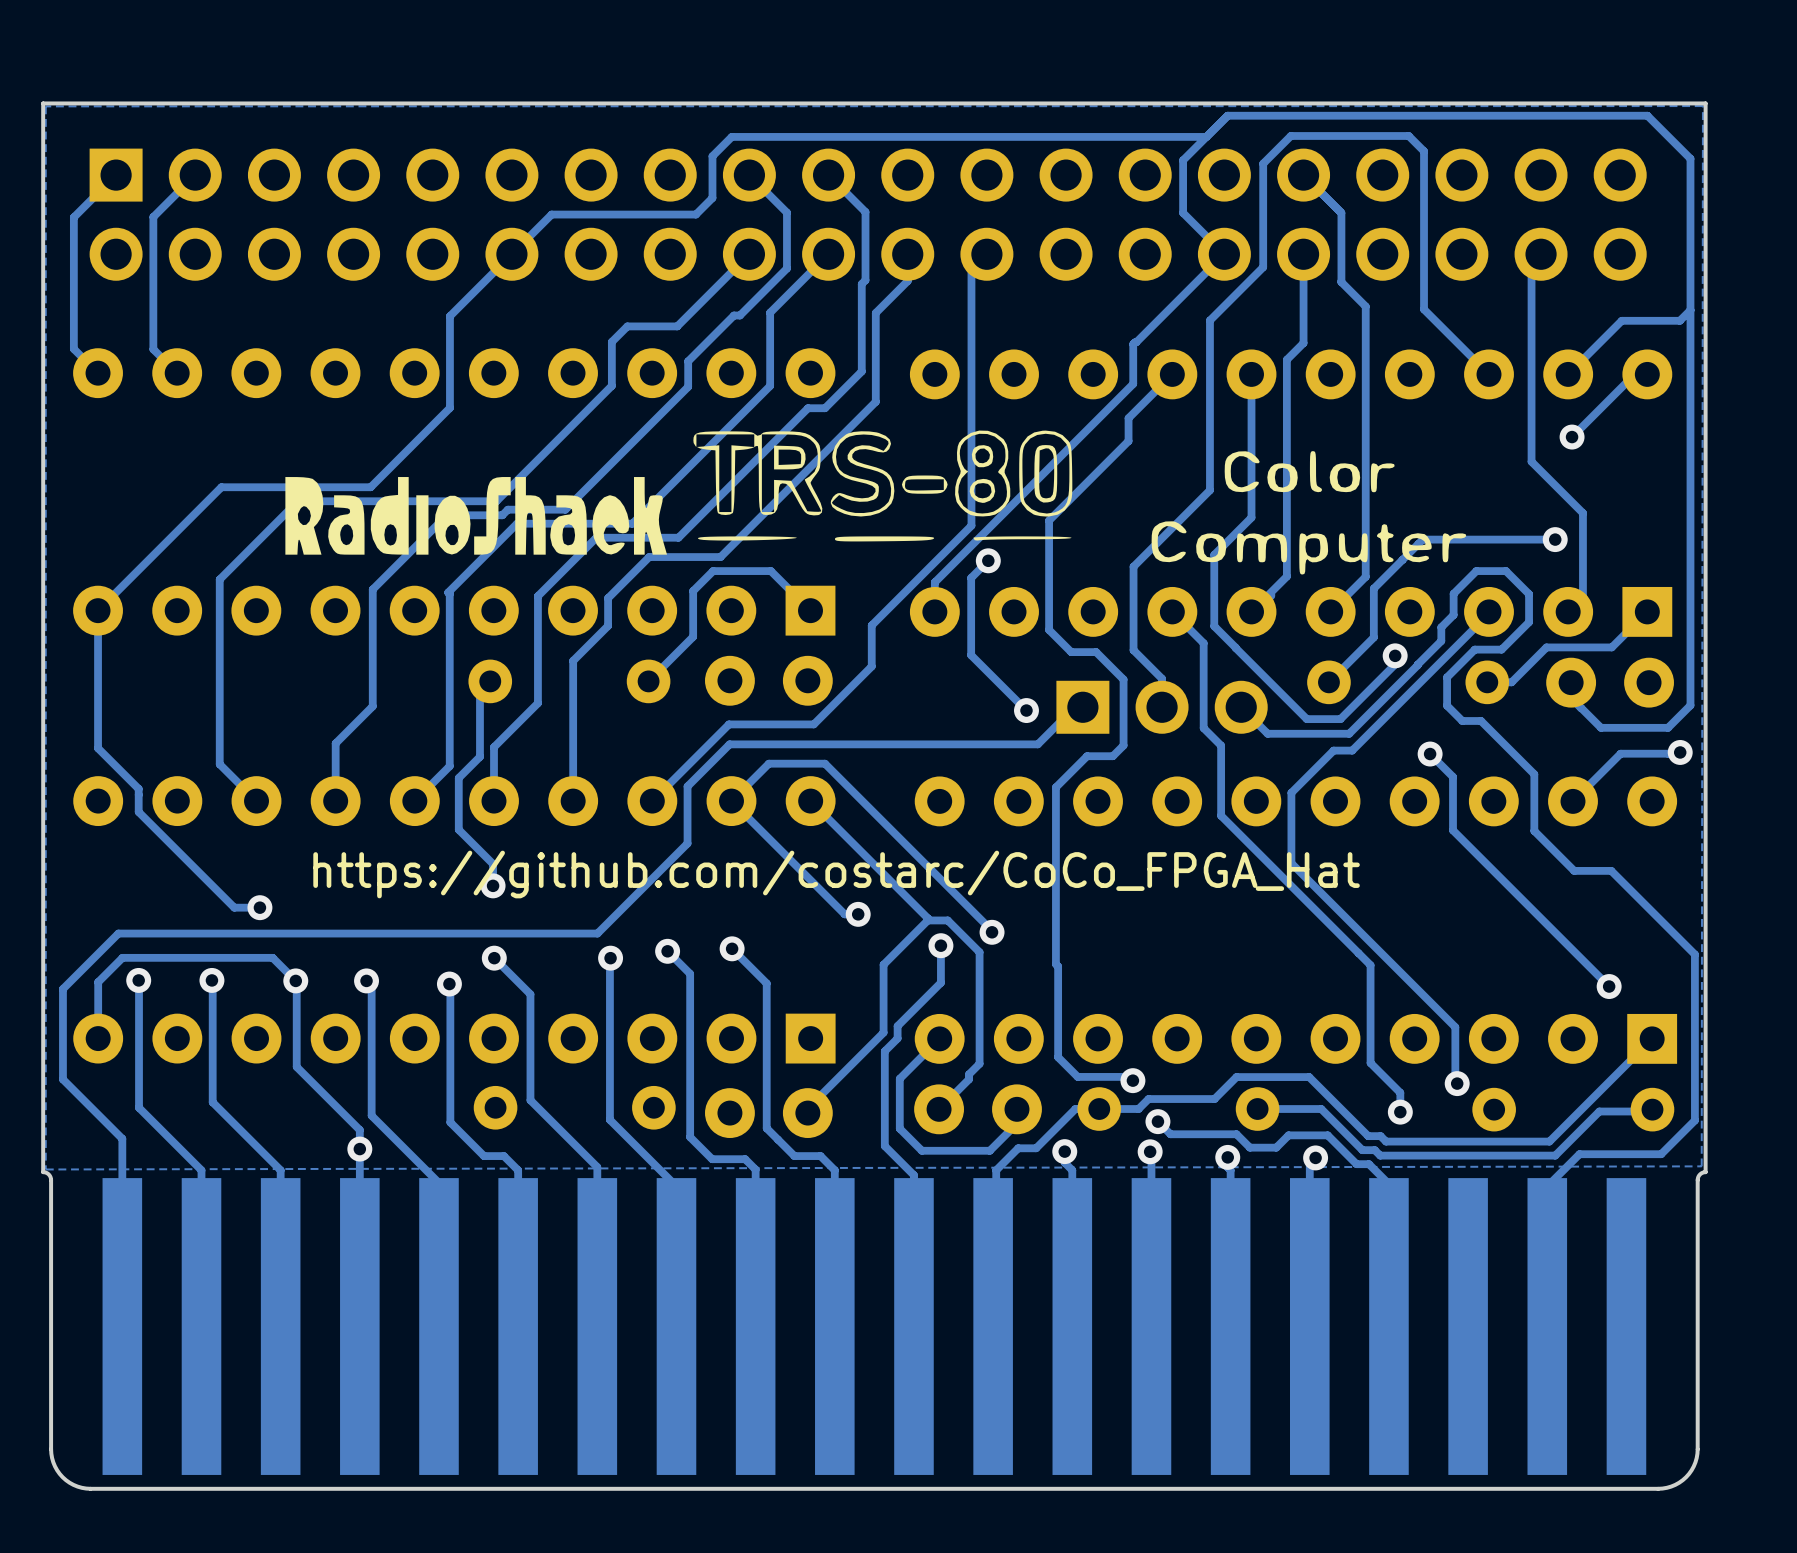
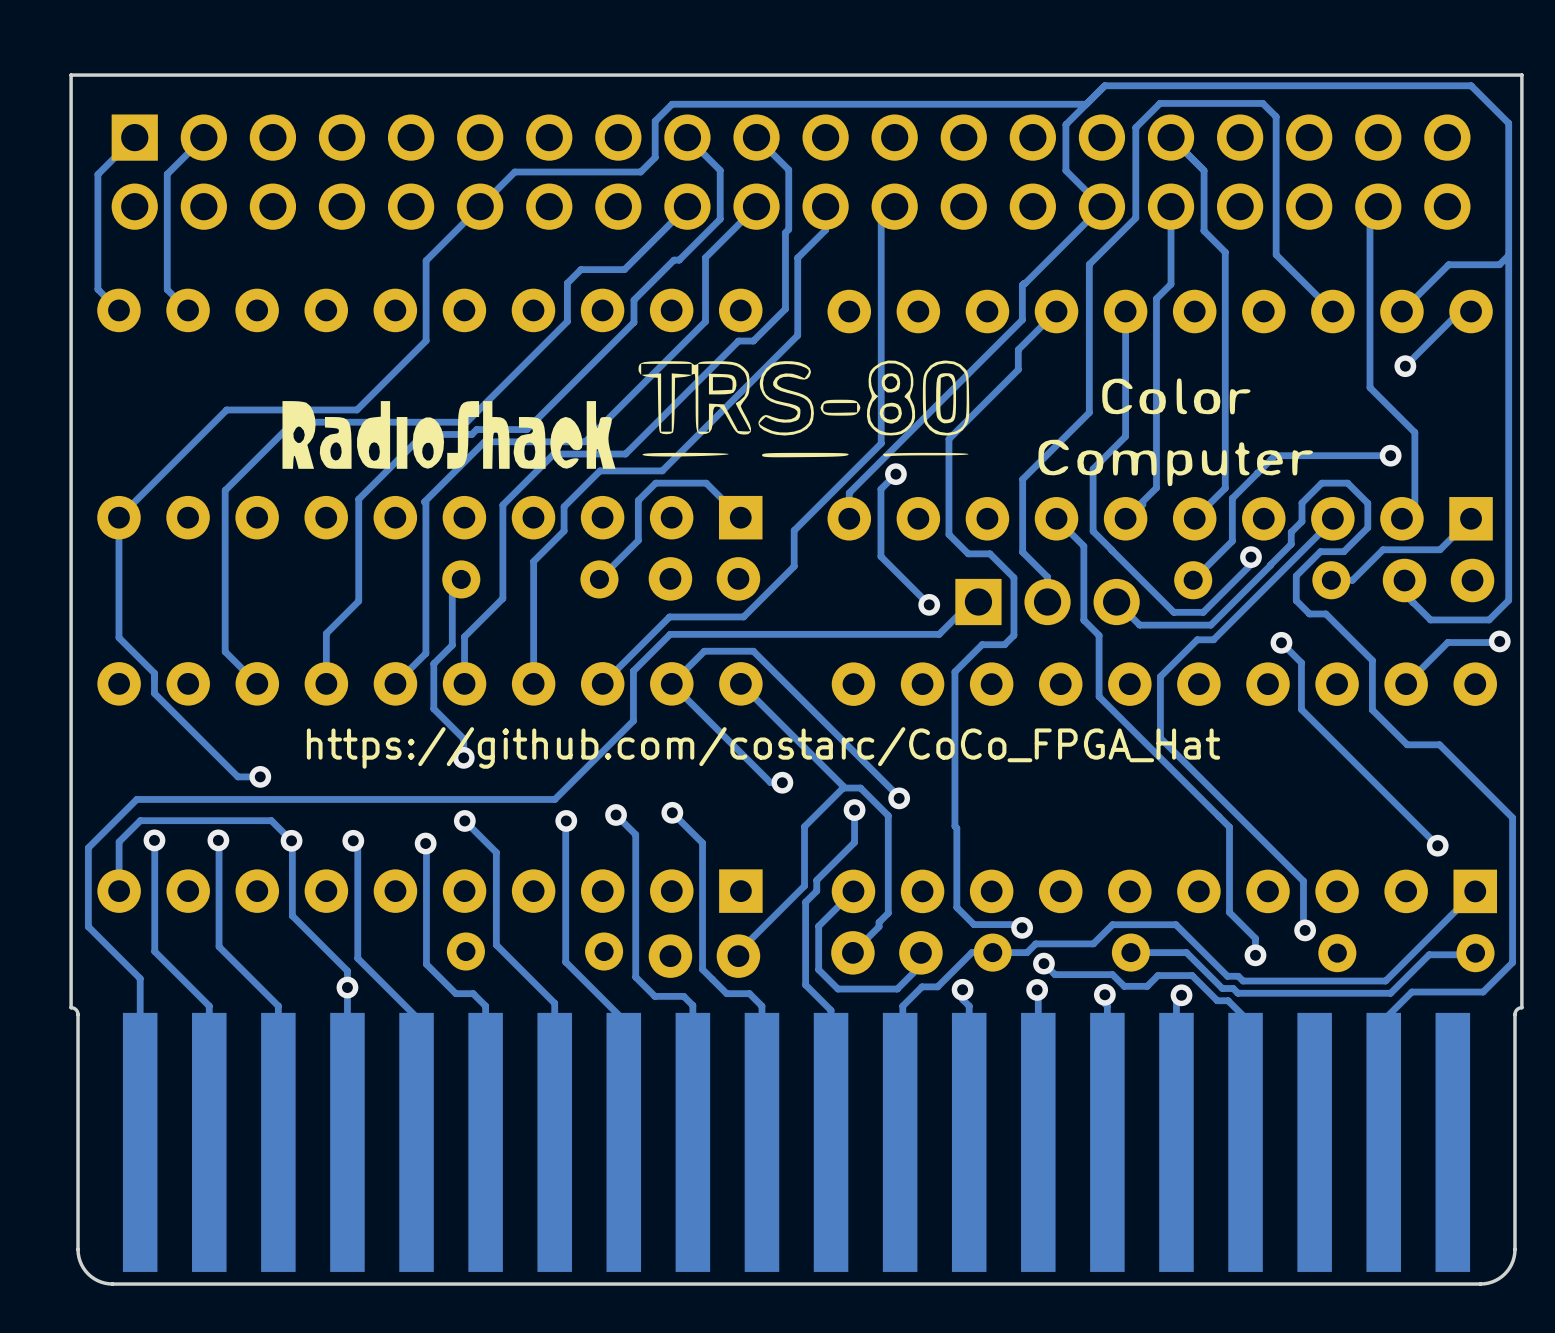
zone outline: (1702, 106) (1701, 1166) (45, 1169) (45, 106) (1702, 106) -> none

